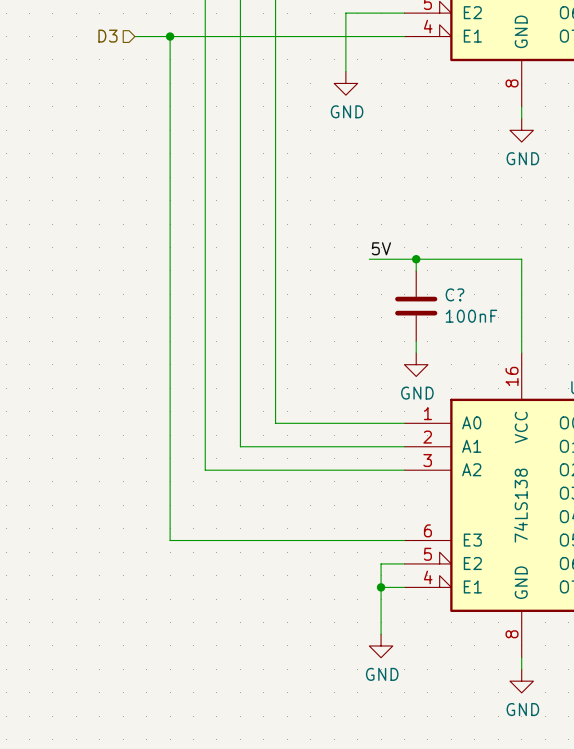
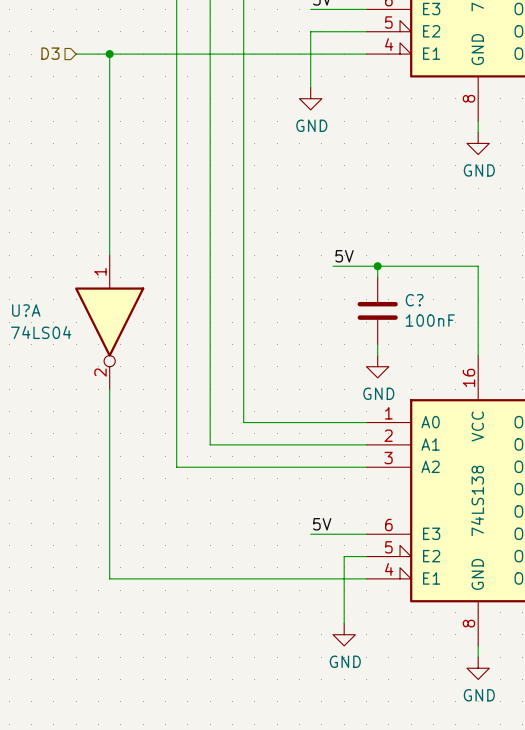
wire: none -> (76, 54) (109, 54) (109, 255)
hierarchical label position: D3 (107, 36) -> D3 (50, 53)
wire: (170, 36) (170, 540) (345, 540) -> none
junction position: (170, 36) -> (109, 54)
U?A: none -> 74LS04 (109, 322)
wire: none -> (109, 389) (109, 578) (344, 578)
label: none -> 5V (322, 524)
junction: (381, 587) -> none

